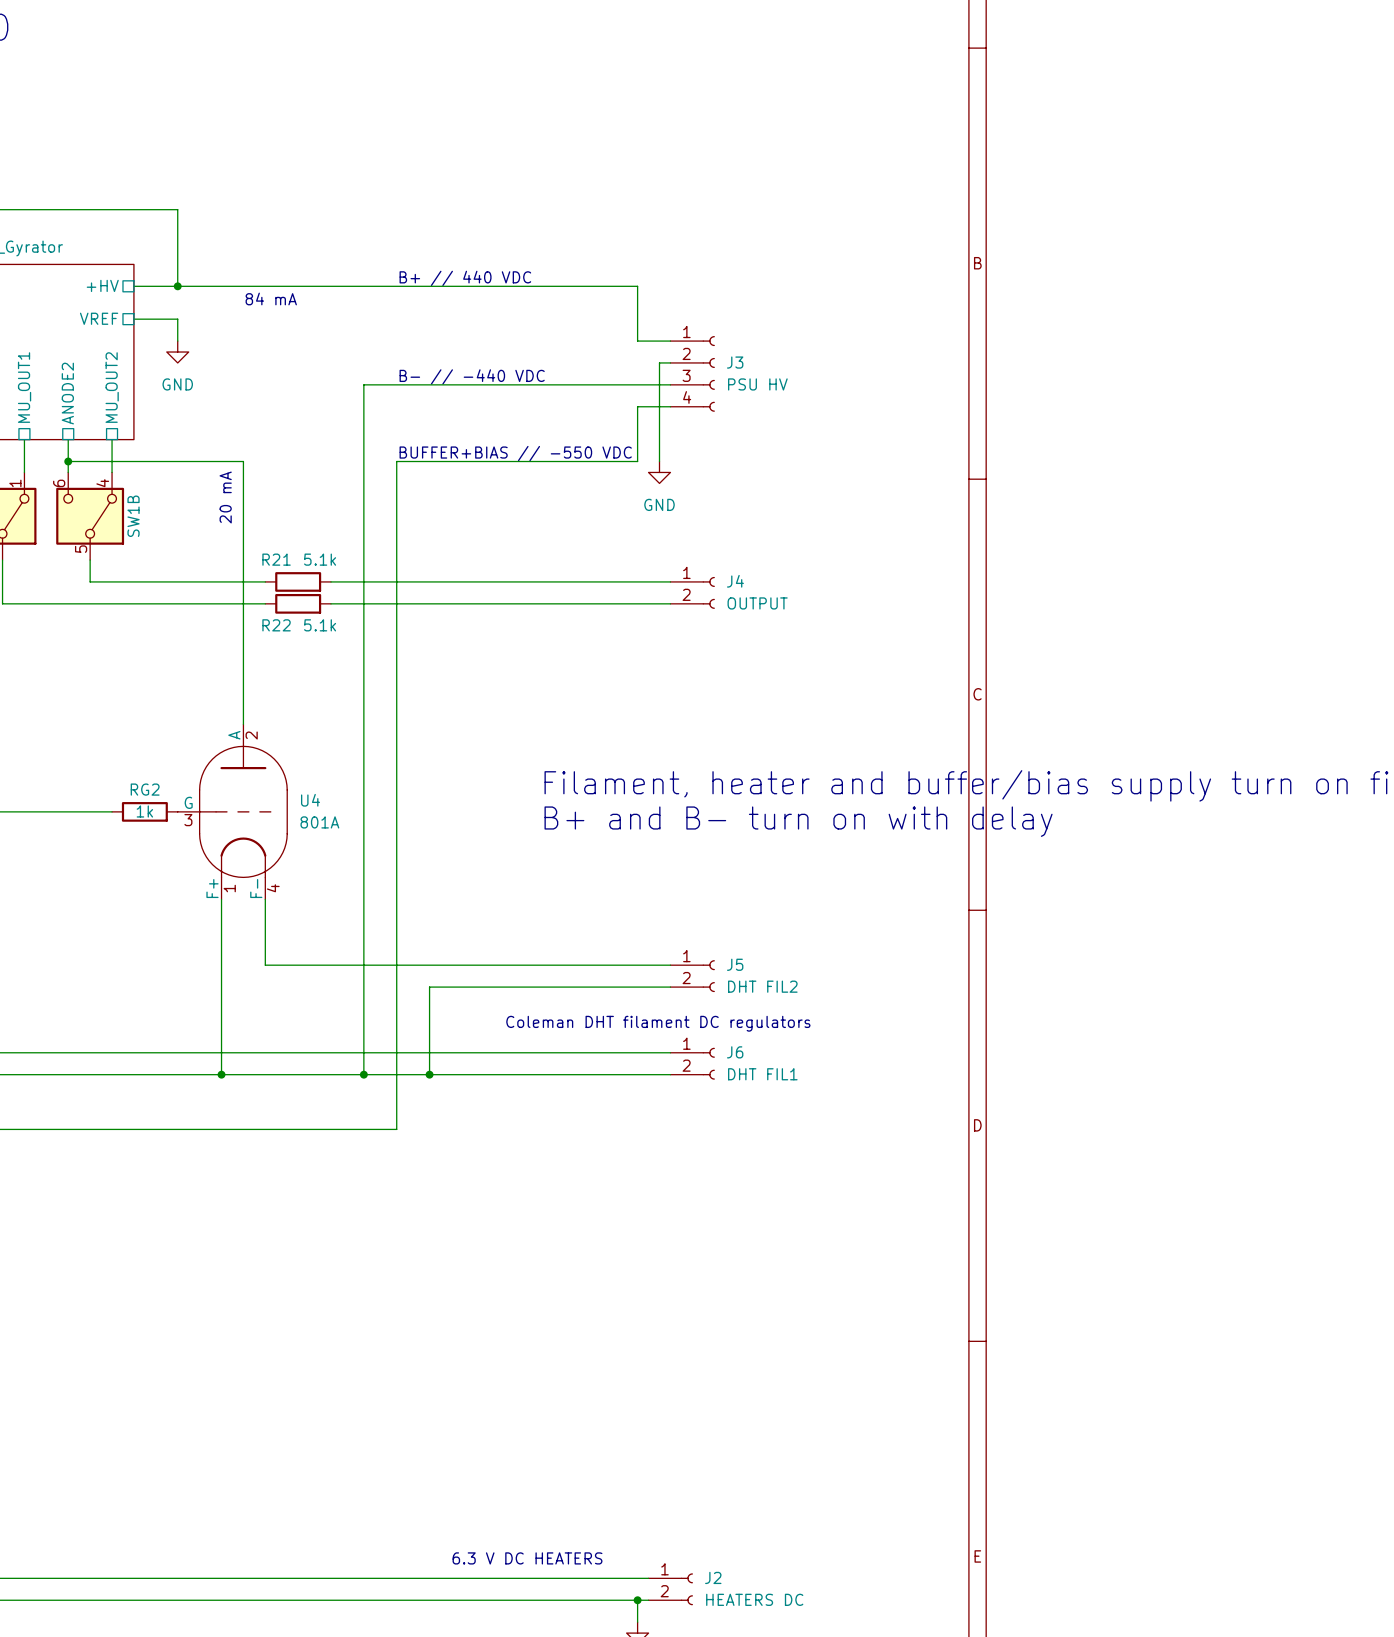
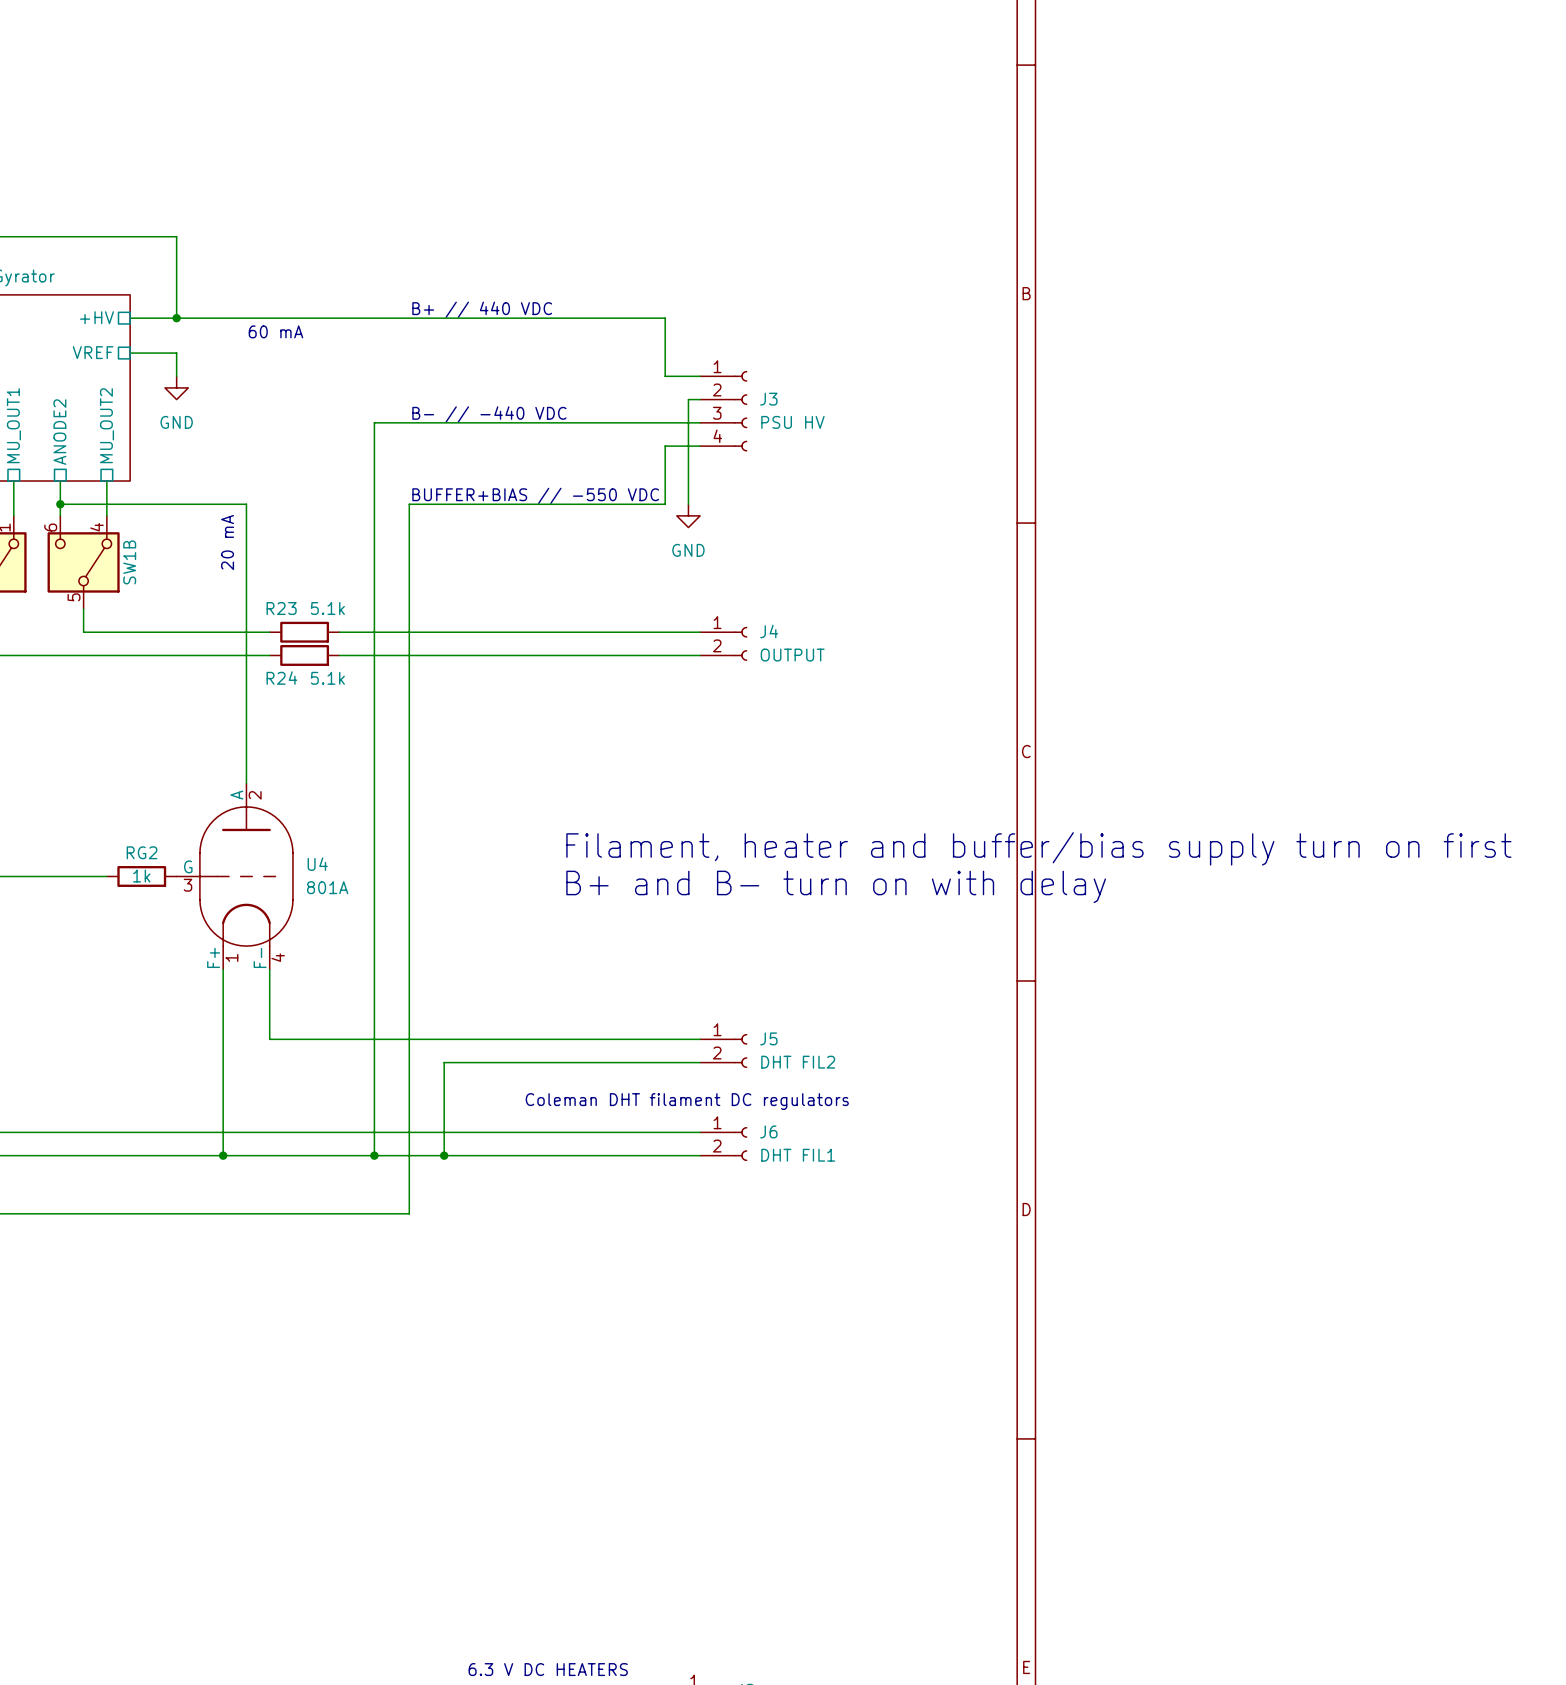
text: 84 mA (271, 298) -> 60 mA (275, 331)
R21 name: R21 (276, 559) -> R23 (281, 608)
R22 name: R22 (276, 625) -> R24 (281, 678)

